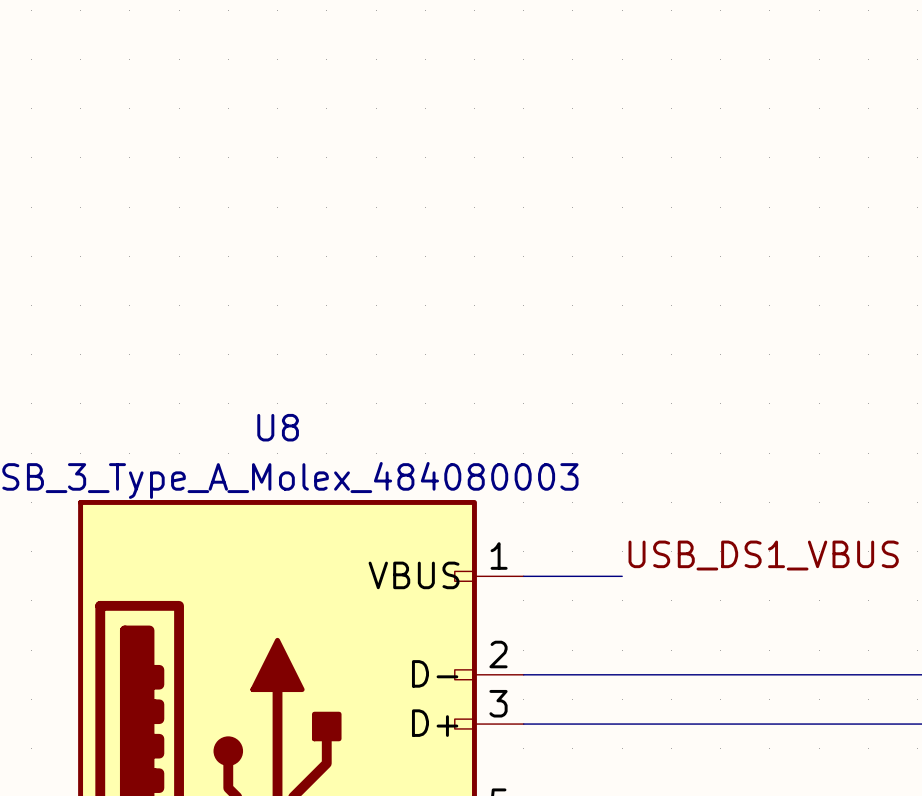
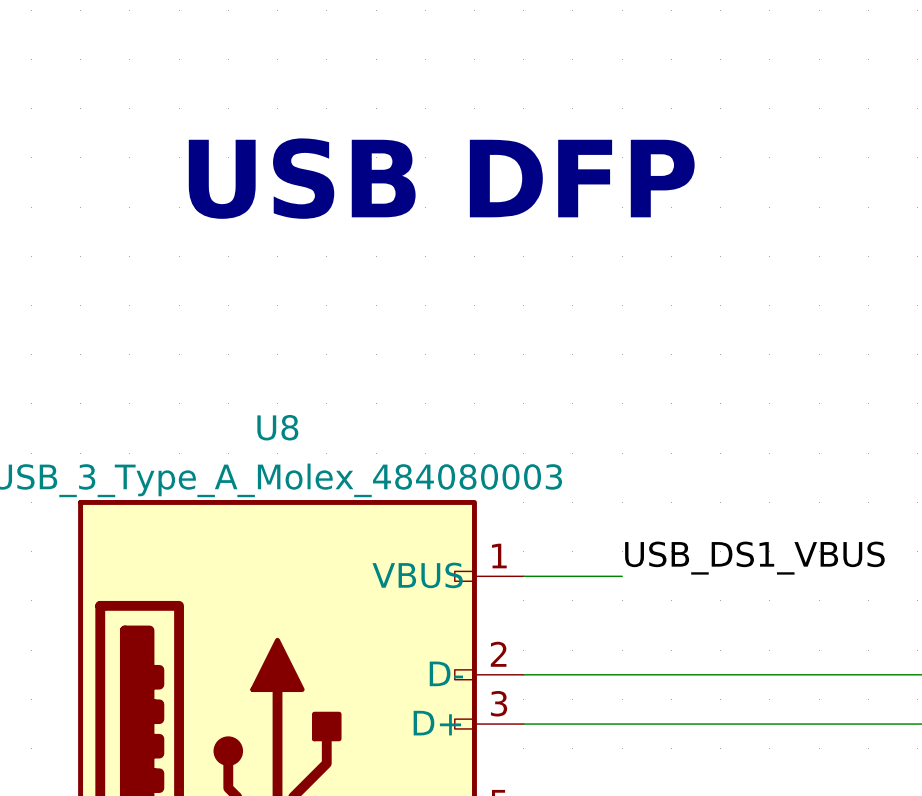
text: none -> USB DFP (441, 178)

